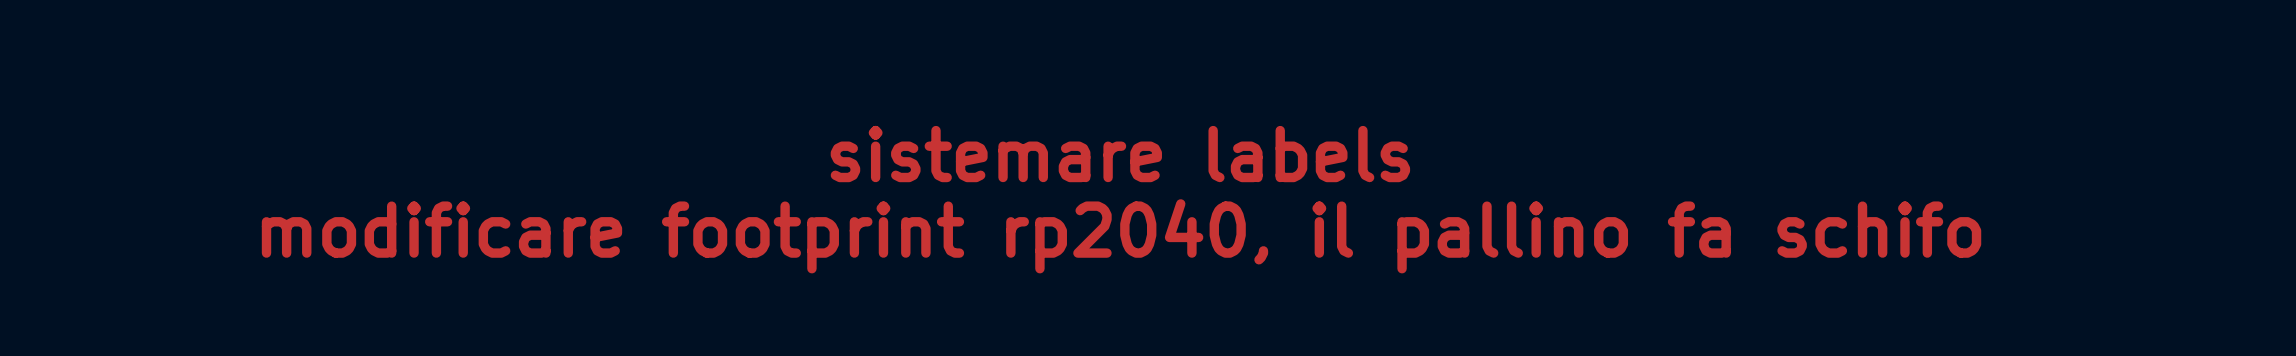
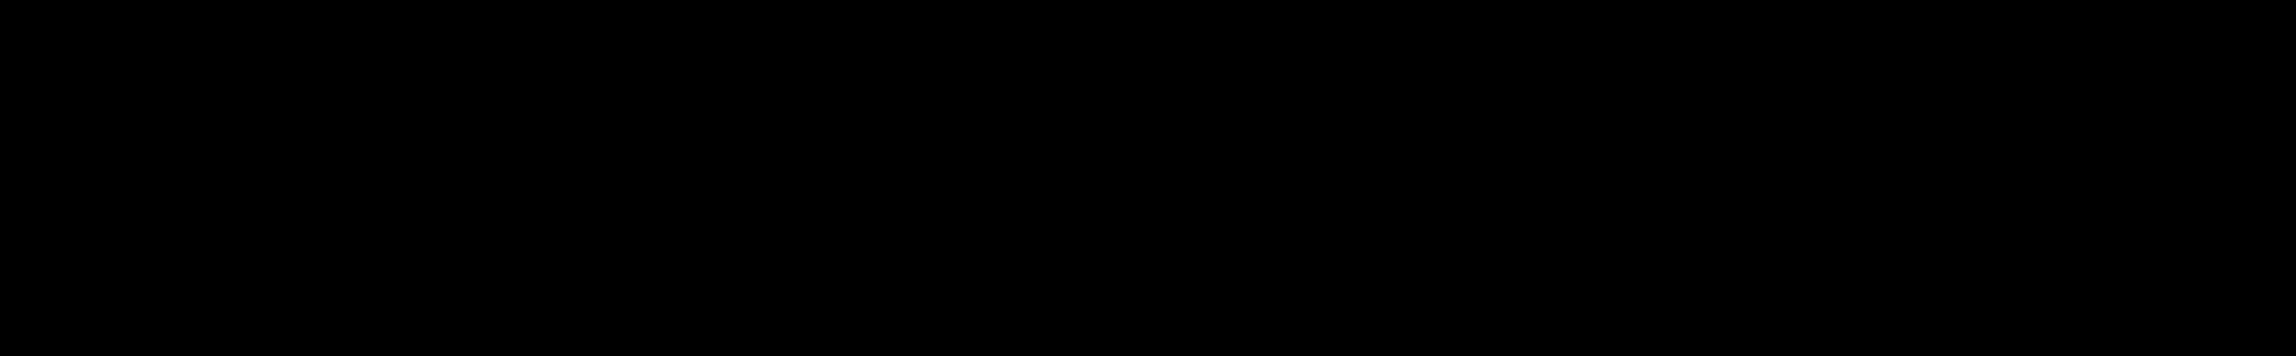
text: sistemare labels (1120, 154) -> none
text: modificare footprint rp2040, il pallino fa schifo (1121, 236) -> none

